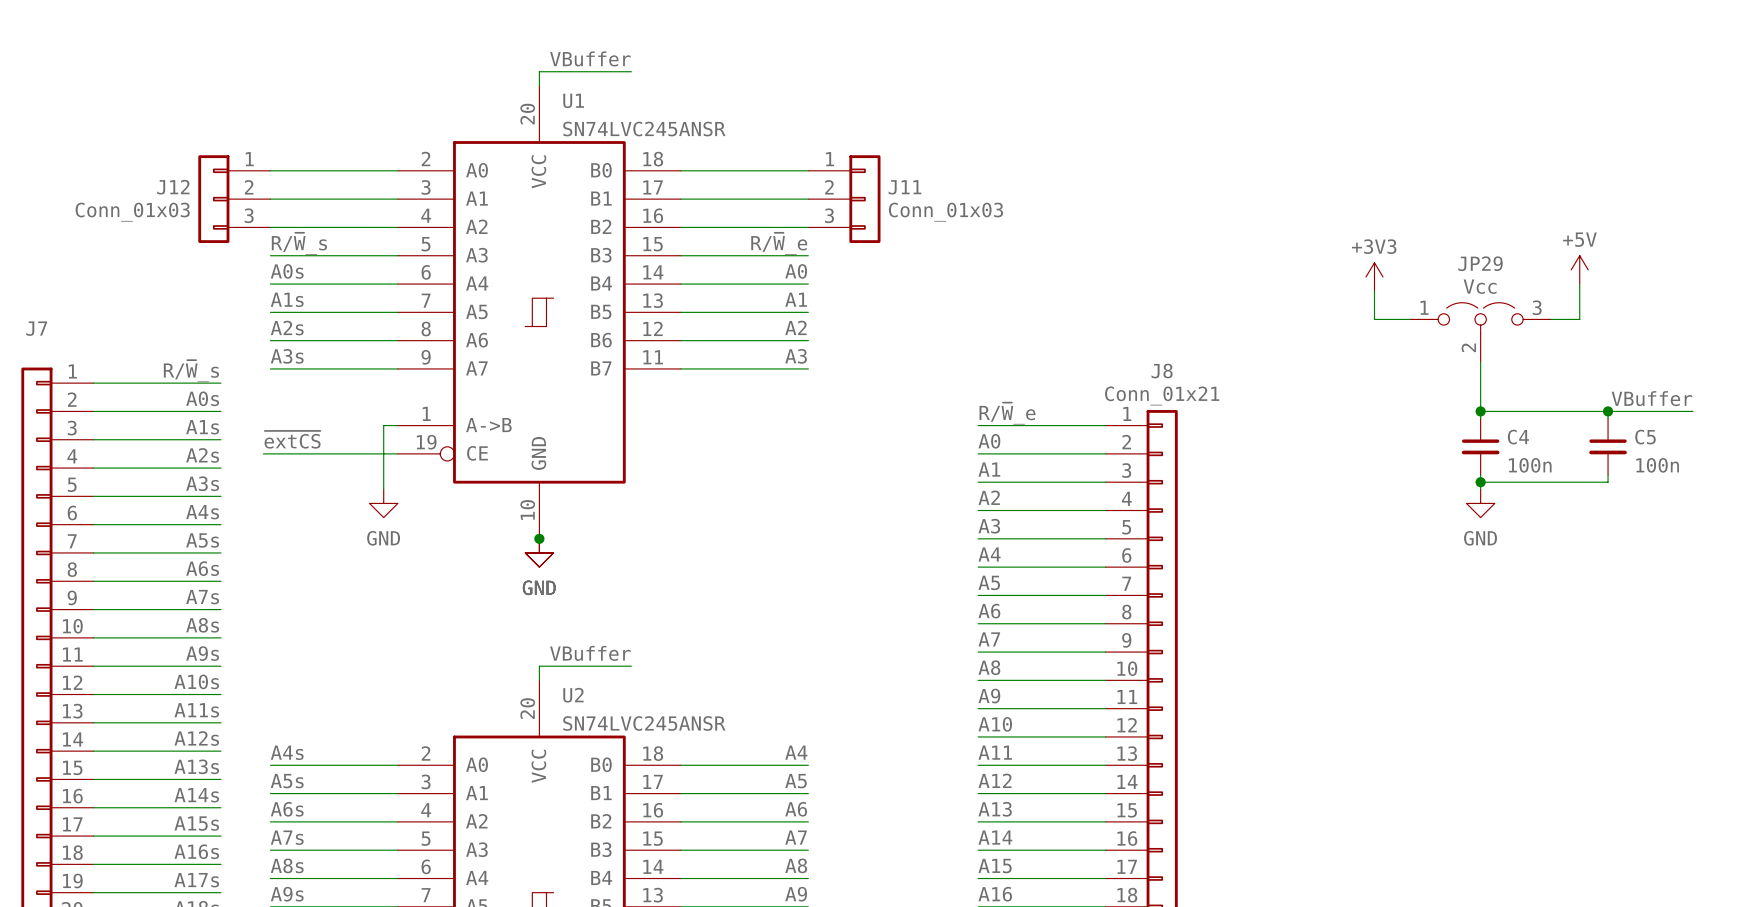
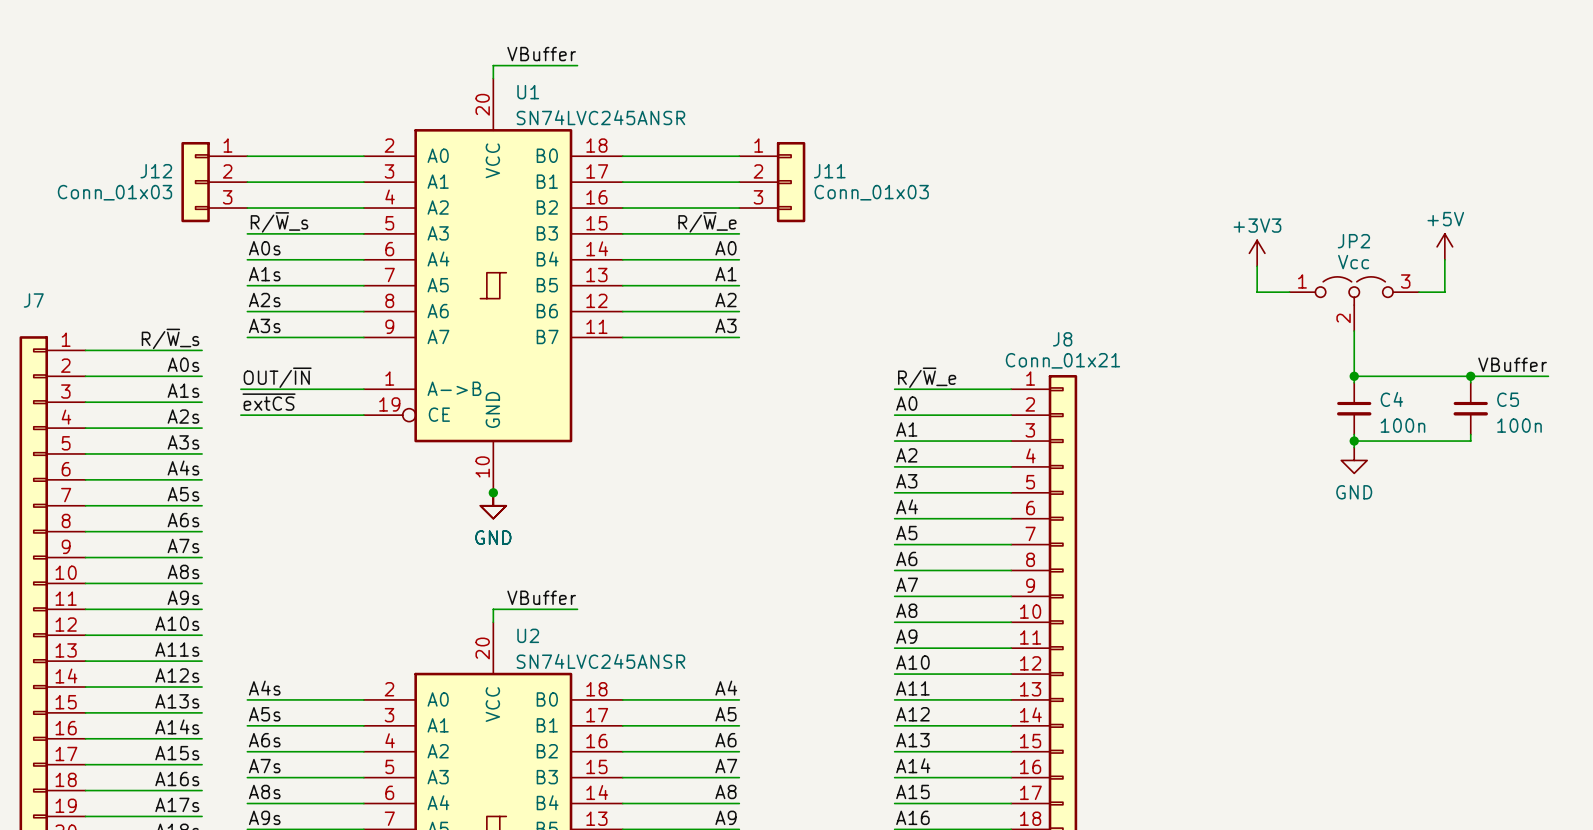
JP29 name: JP29 (1480, 263) -> JP2 (1353, 241)
label: none -> OUT/~{IN} (277, 377)
wire: (383, 425) (383, 489) -> (350, 389) (240, 389)
power symbol: GND (383, 503) -> none

